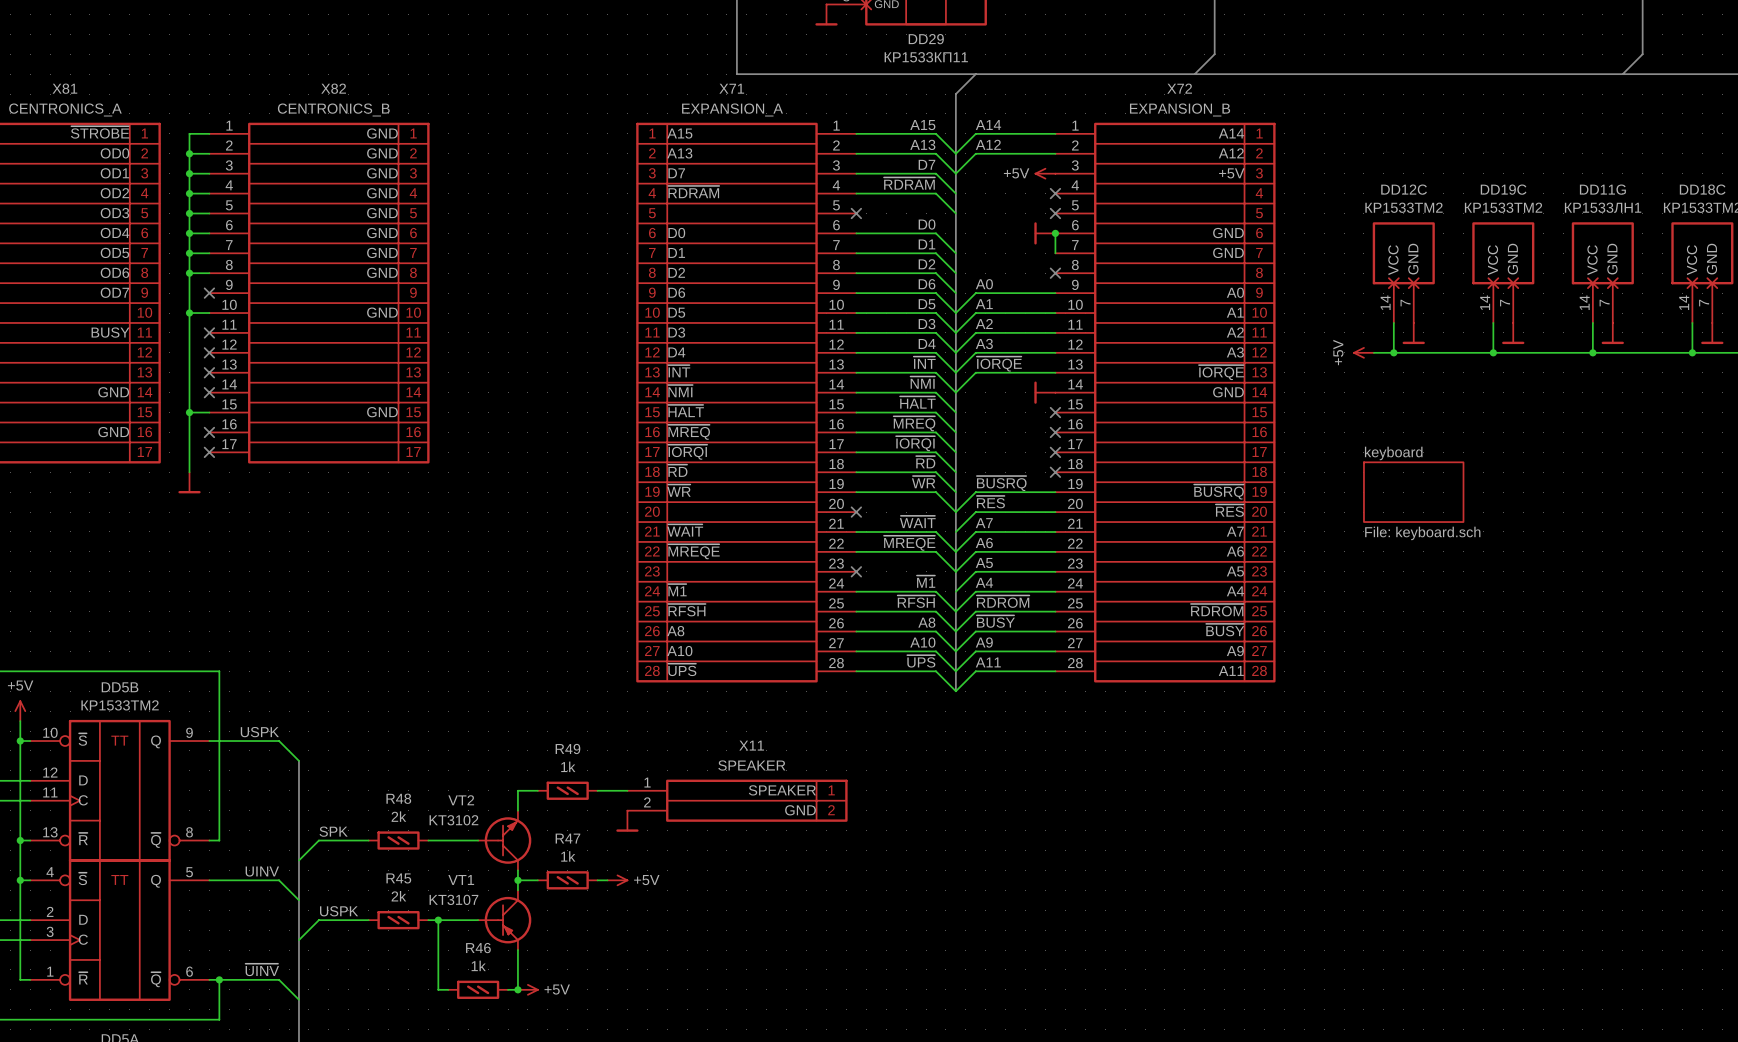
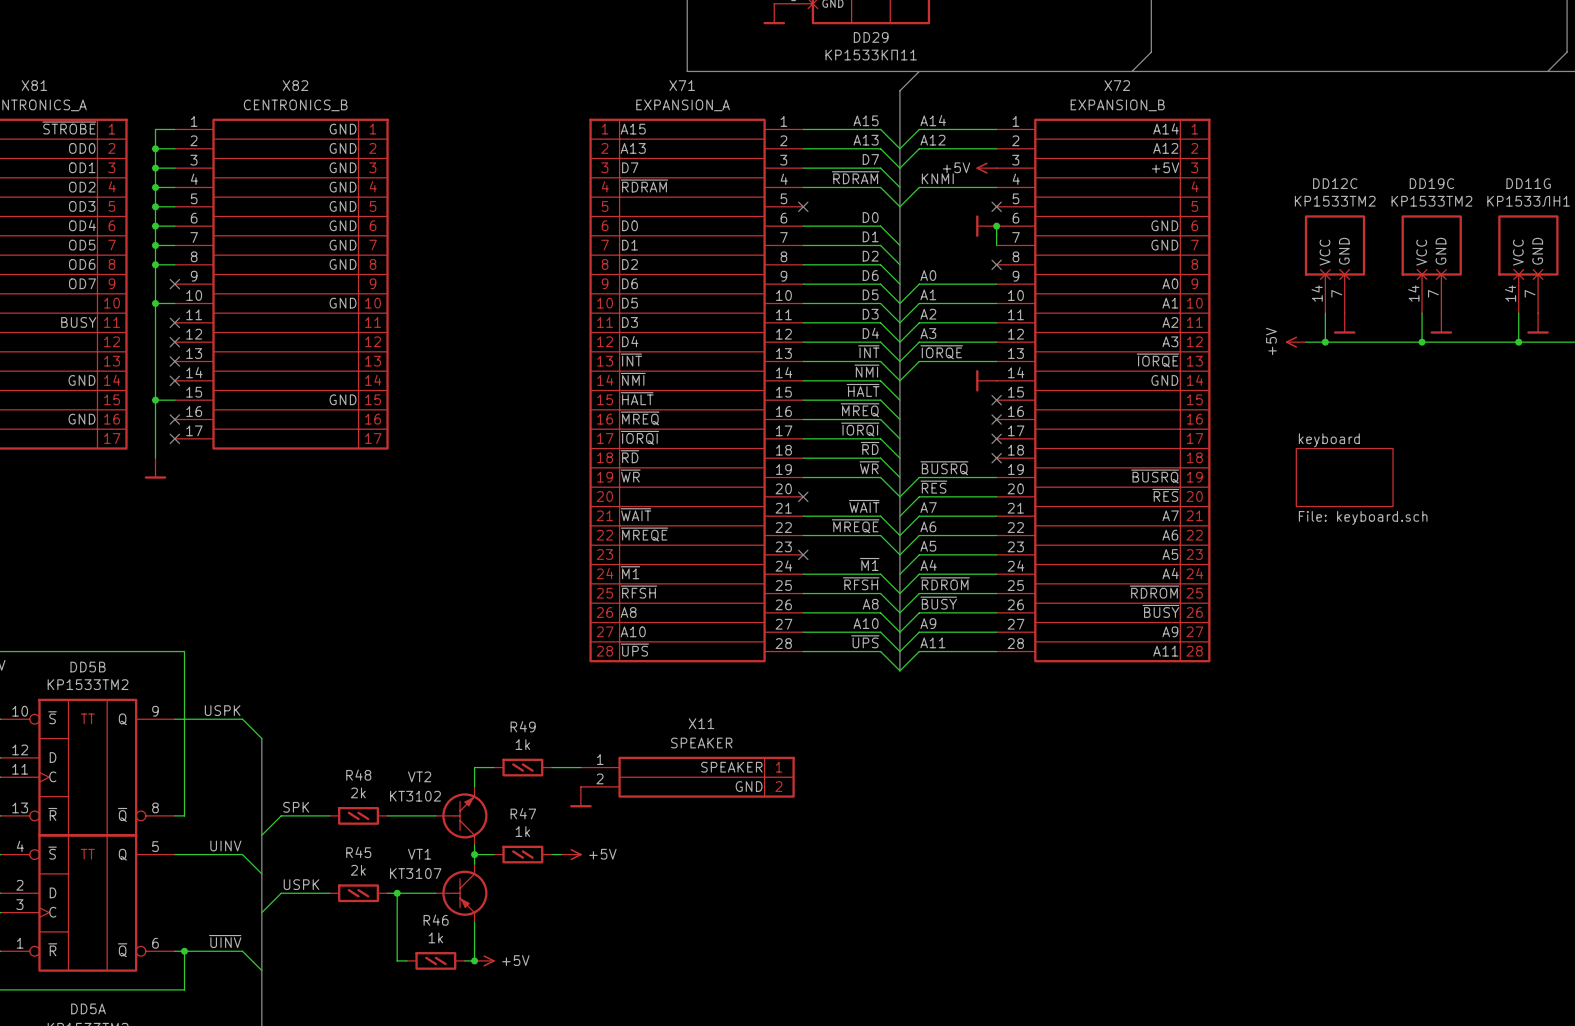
label: none -> KNMI (937, 178)
wire: none -> (996, 187) (919, 187) (899, 206)
no-connect mark: (1055, 193) -> none

